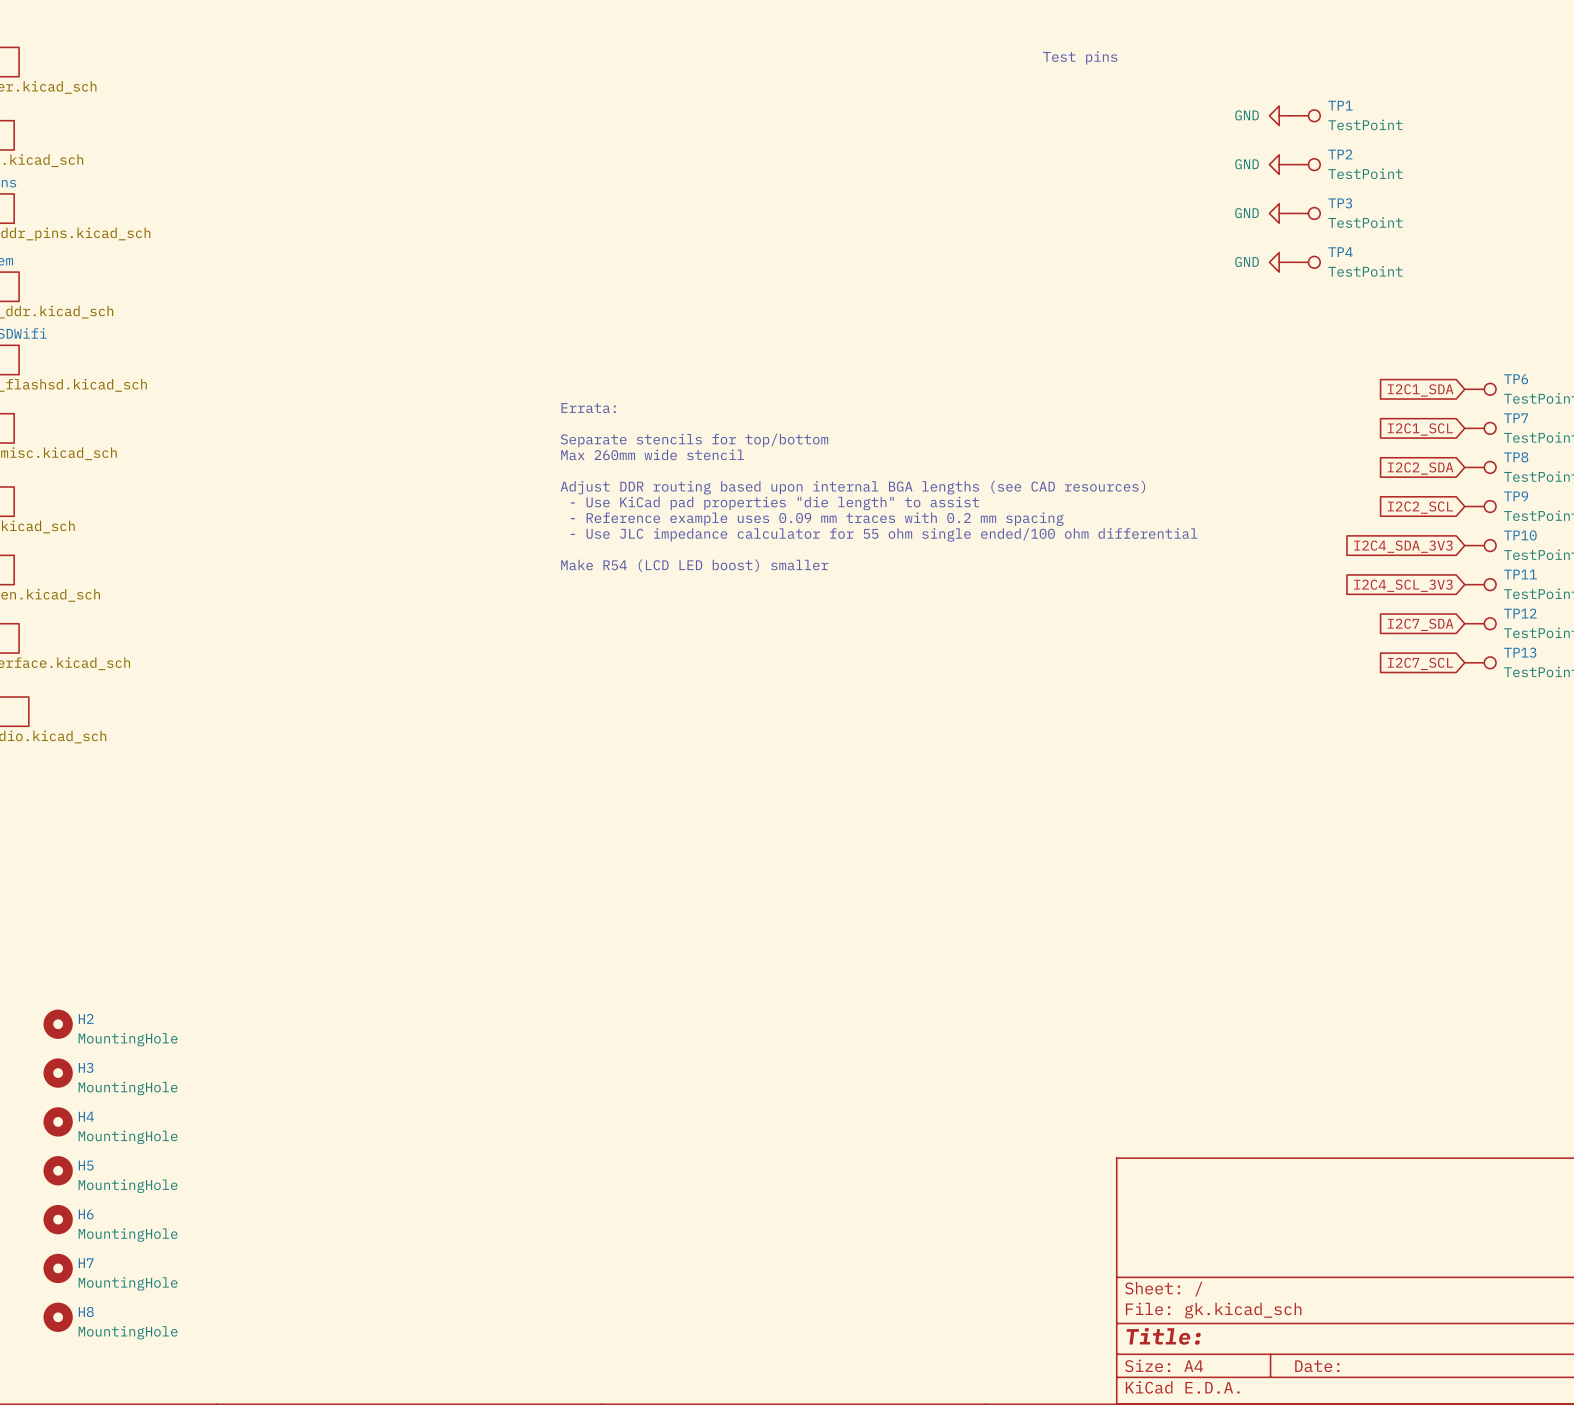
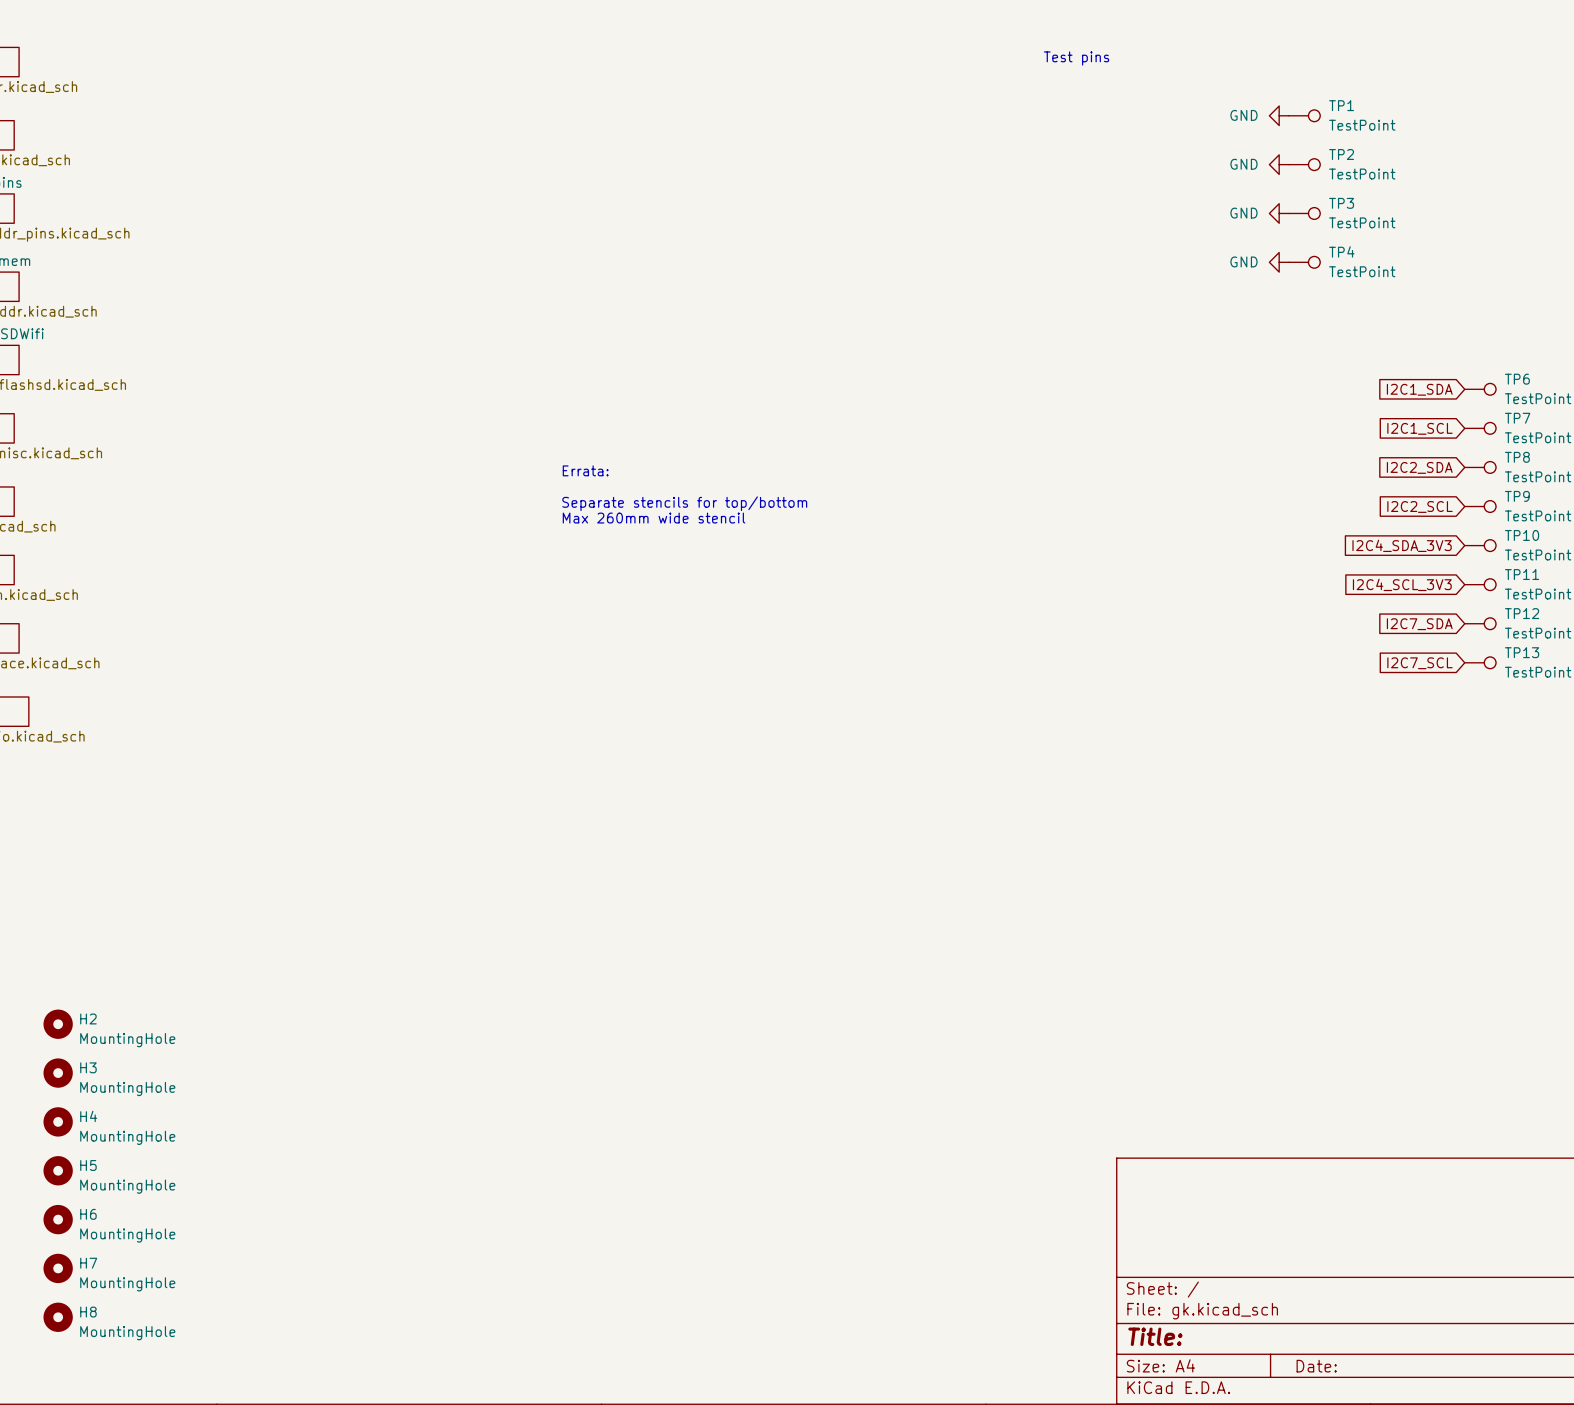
text position: Errata: (588, 408) -> Errata: (585, 470)
text: Separate stencils for top/bottom (694, 440) -> none
text: Max 260mm wide stencil (652, 454) -> none
text: Adjust DDR routing based upon internal BGA lengths (see CAD resources) (852, 487) -> none
text: - Use KiCad pad properties "die length" to assist (774, 503) -> Separate stencils for top/bottom (684, 503)
text: - Reference example uses 0.09 mm traces with 0.2 mm spacing (817, 519) -> Max 260mm wide stencil (654, 518)
text: - Use JLC impedance calculator for 55 ohm single ended/100 ohm differential (884, 534) -> none
text: Make R54 (LCD LED boost) smaller (694, 565) -> none

